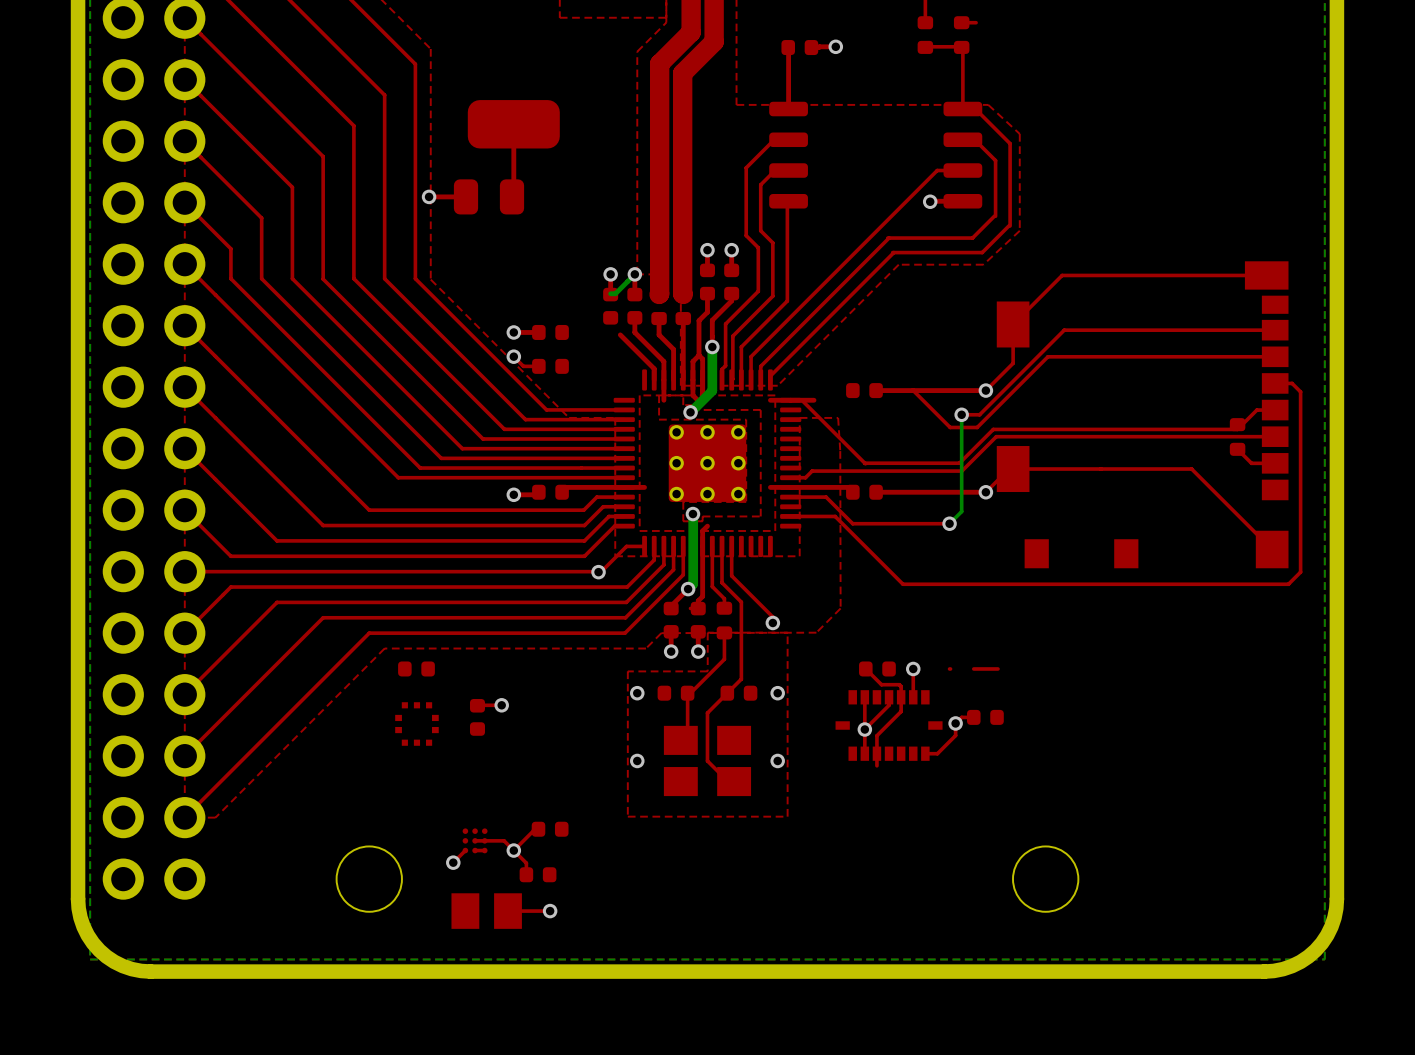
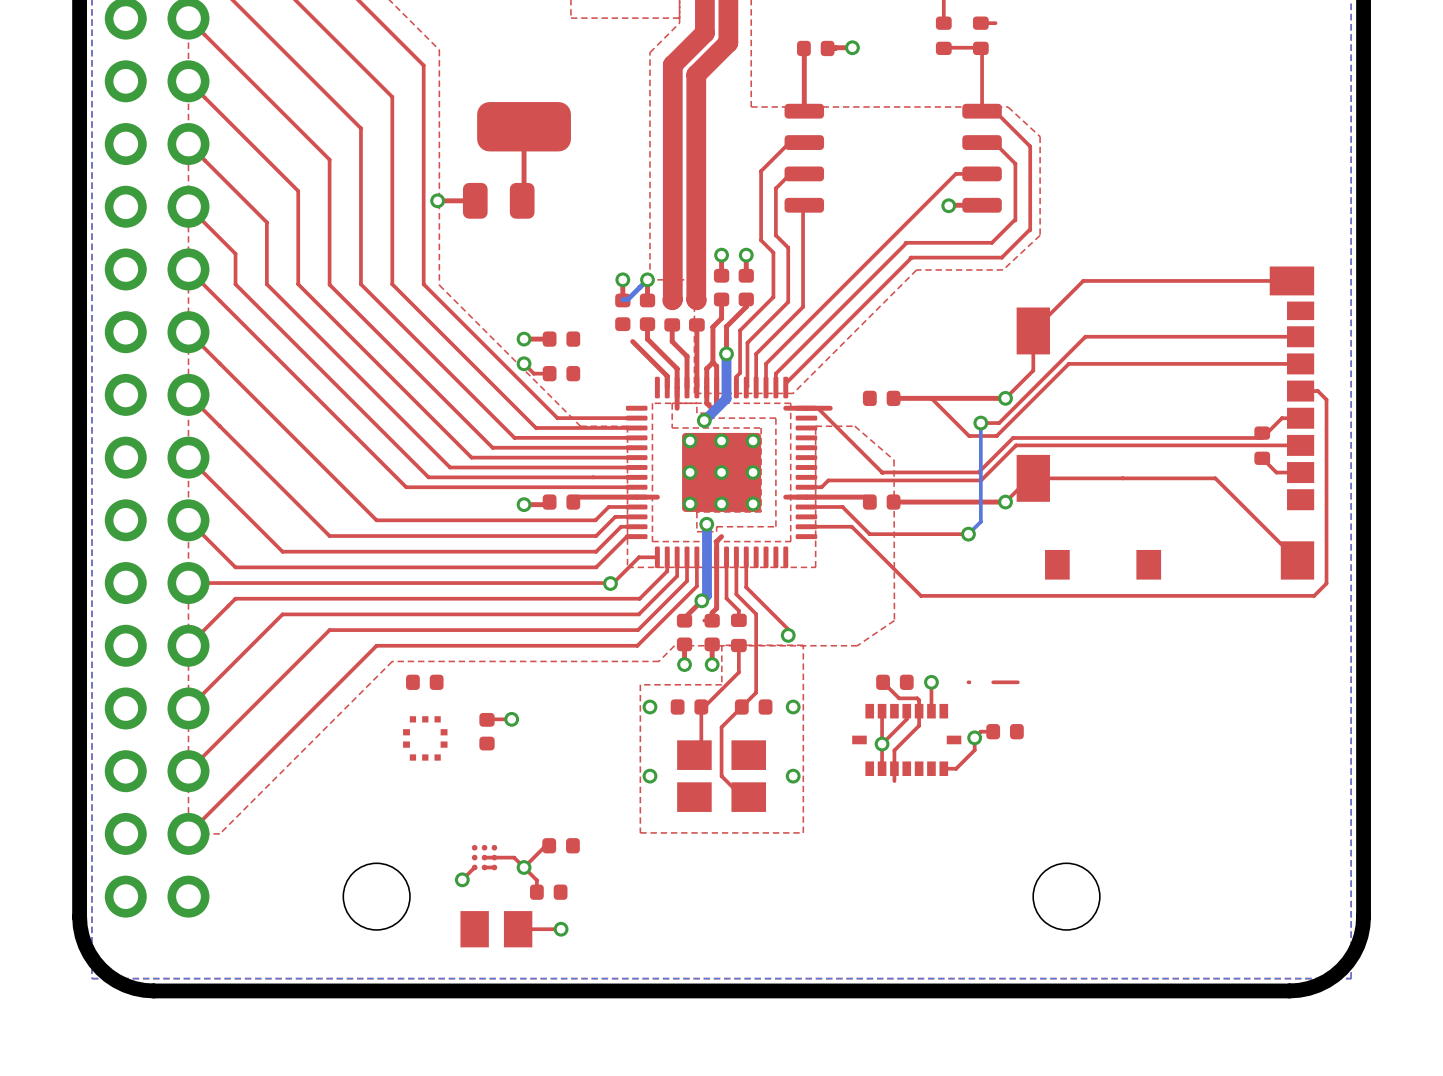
top zone outline: (838, 417) (840, 451) (840, 608) (816, 632) (661, 633) -> (854, 426) (894, 460) (894, 620) (857, 645) (674, 645)

